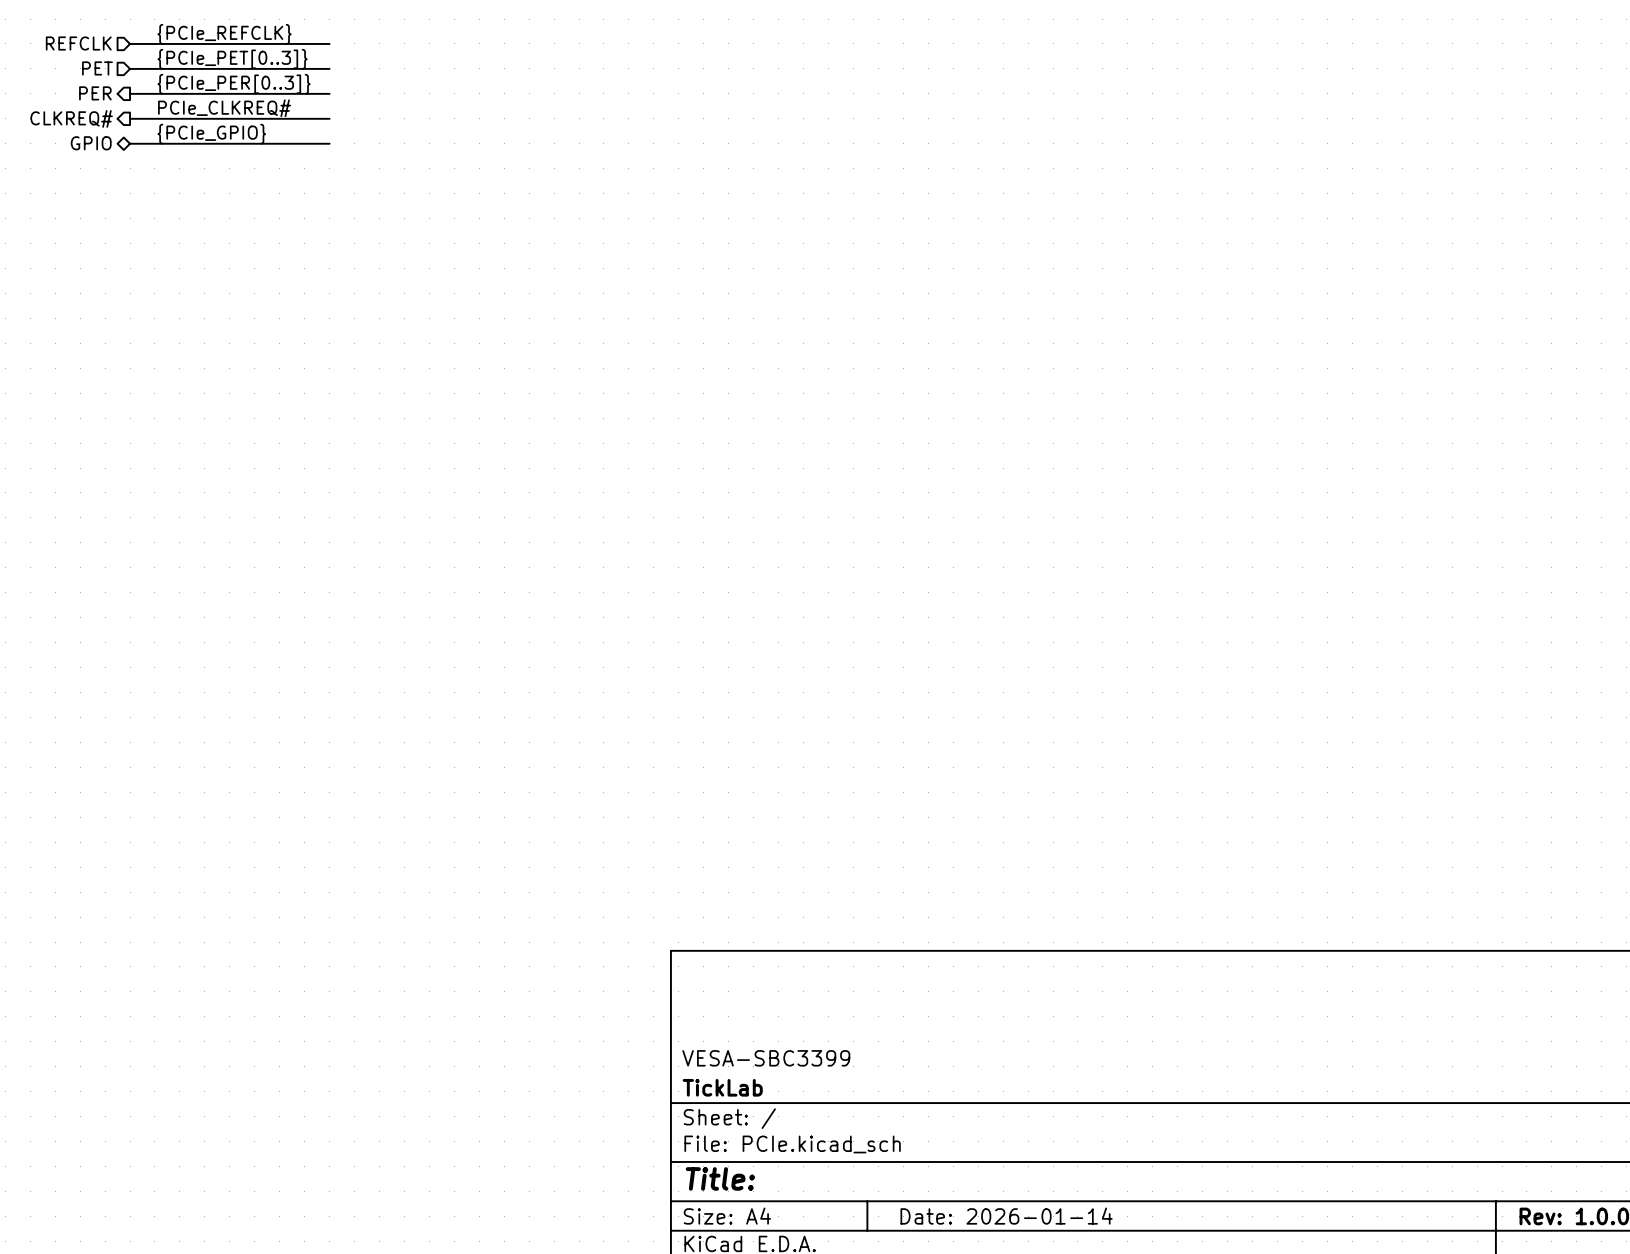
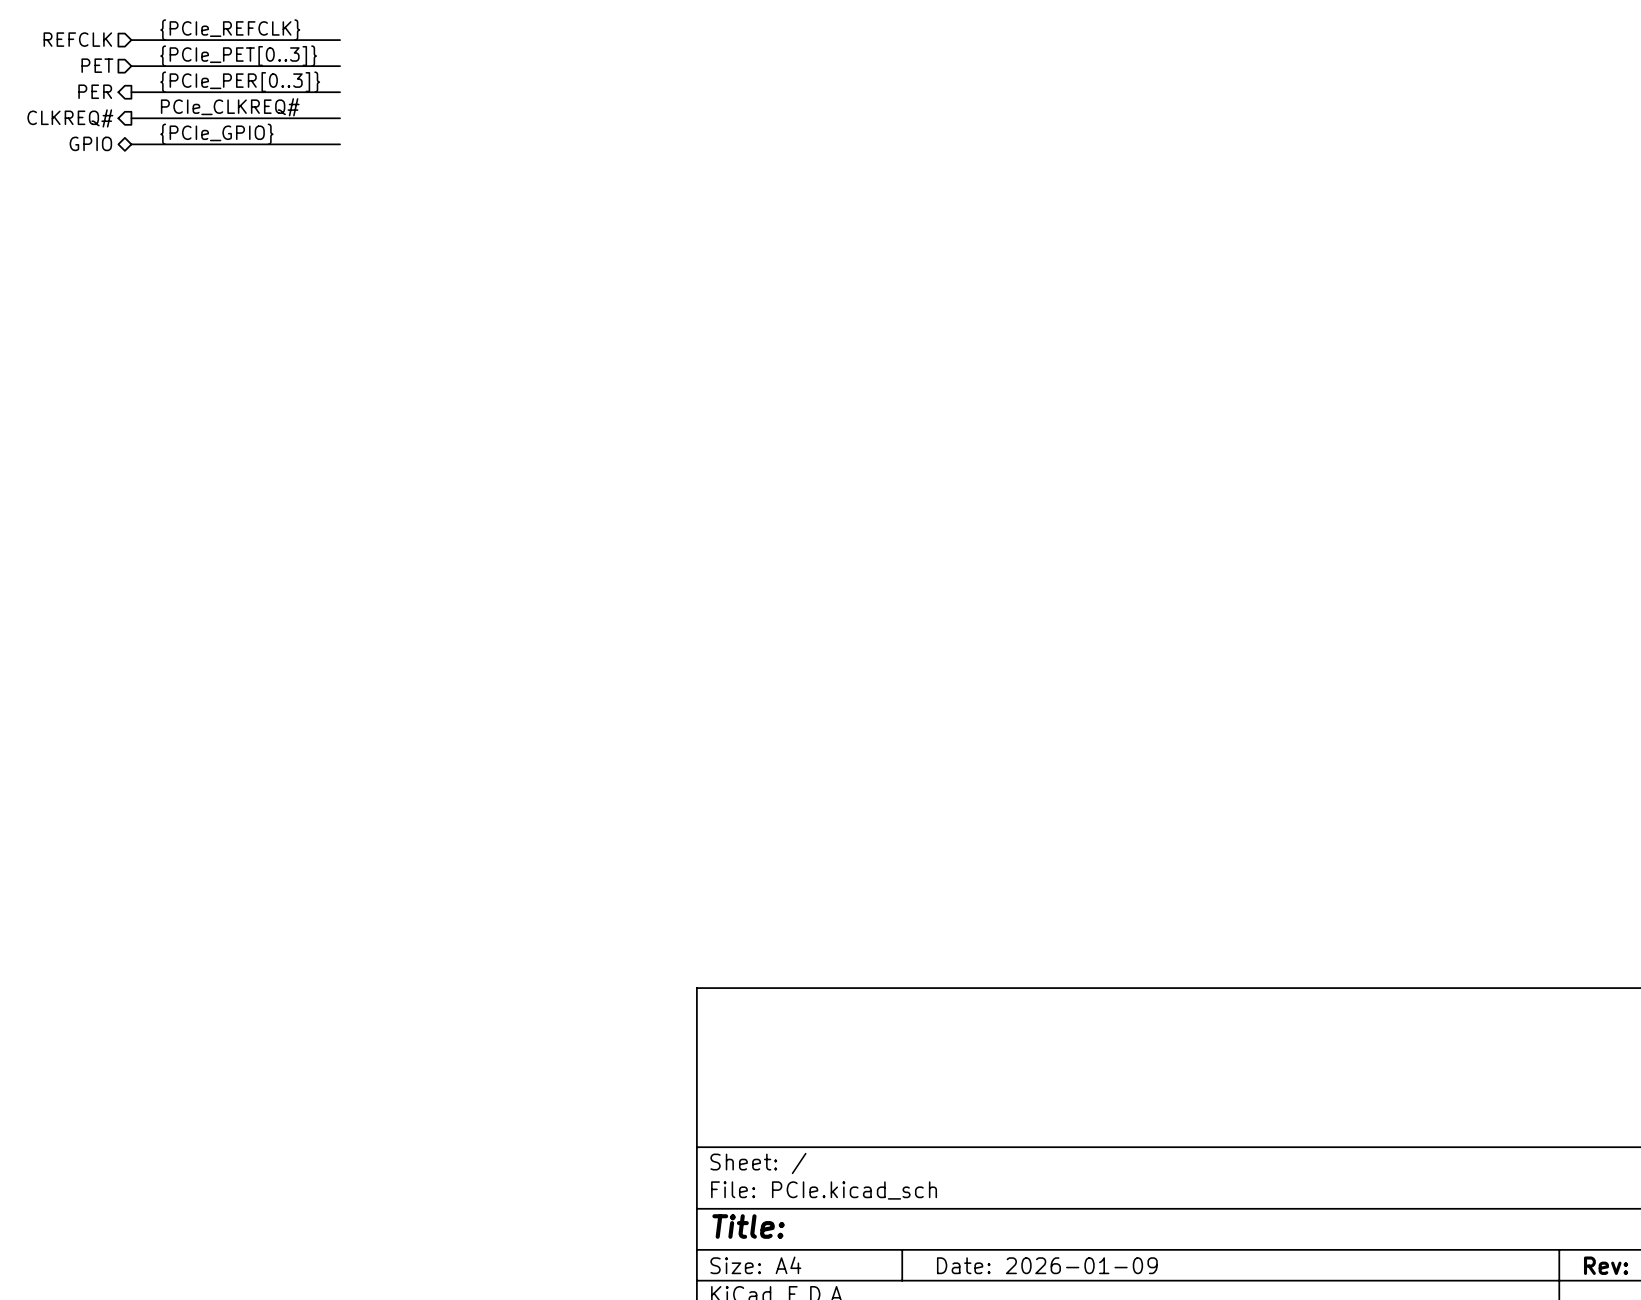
title block: VESA-SBC3399 (766, 1058) -> none
title block: TickLab (722, 1087) -> none
title block: Date: 2026-01-14 (1006, 1216) -> Date: 2026-01-09 (1047, 1265)

